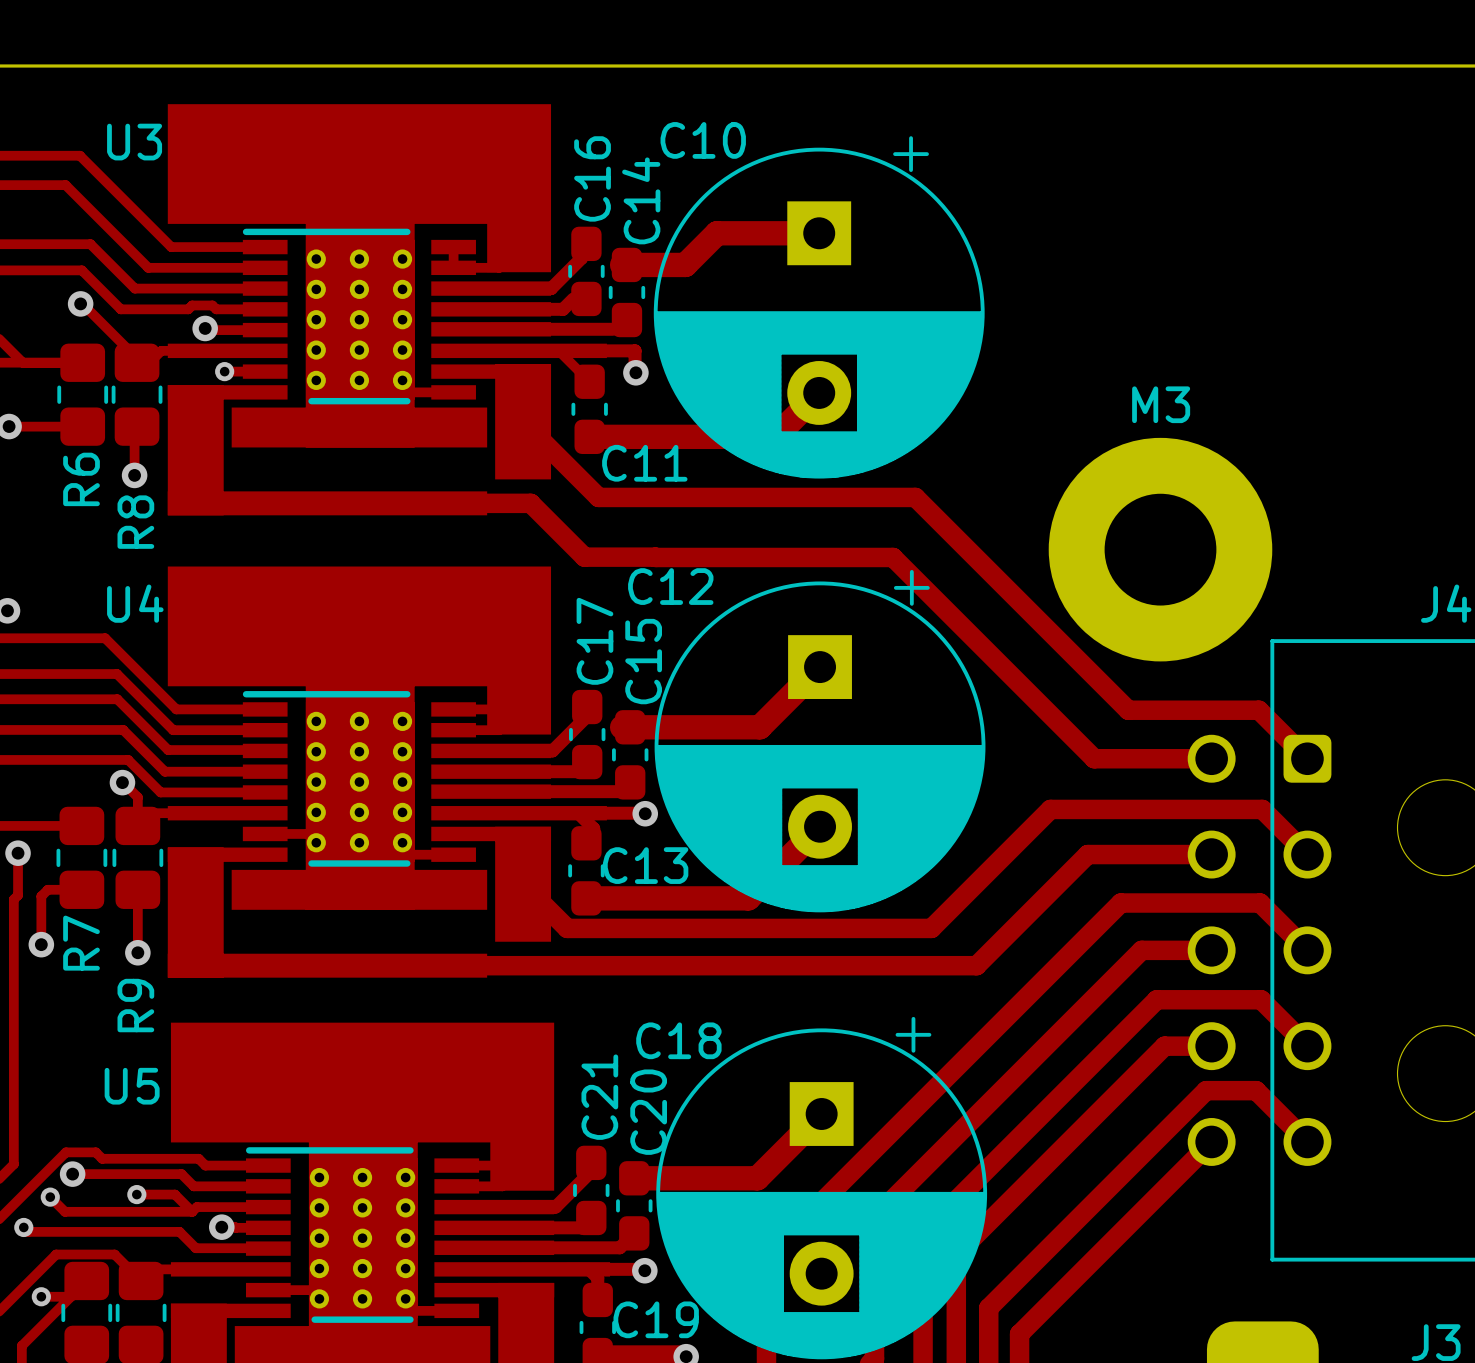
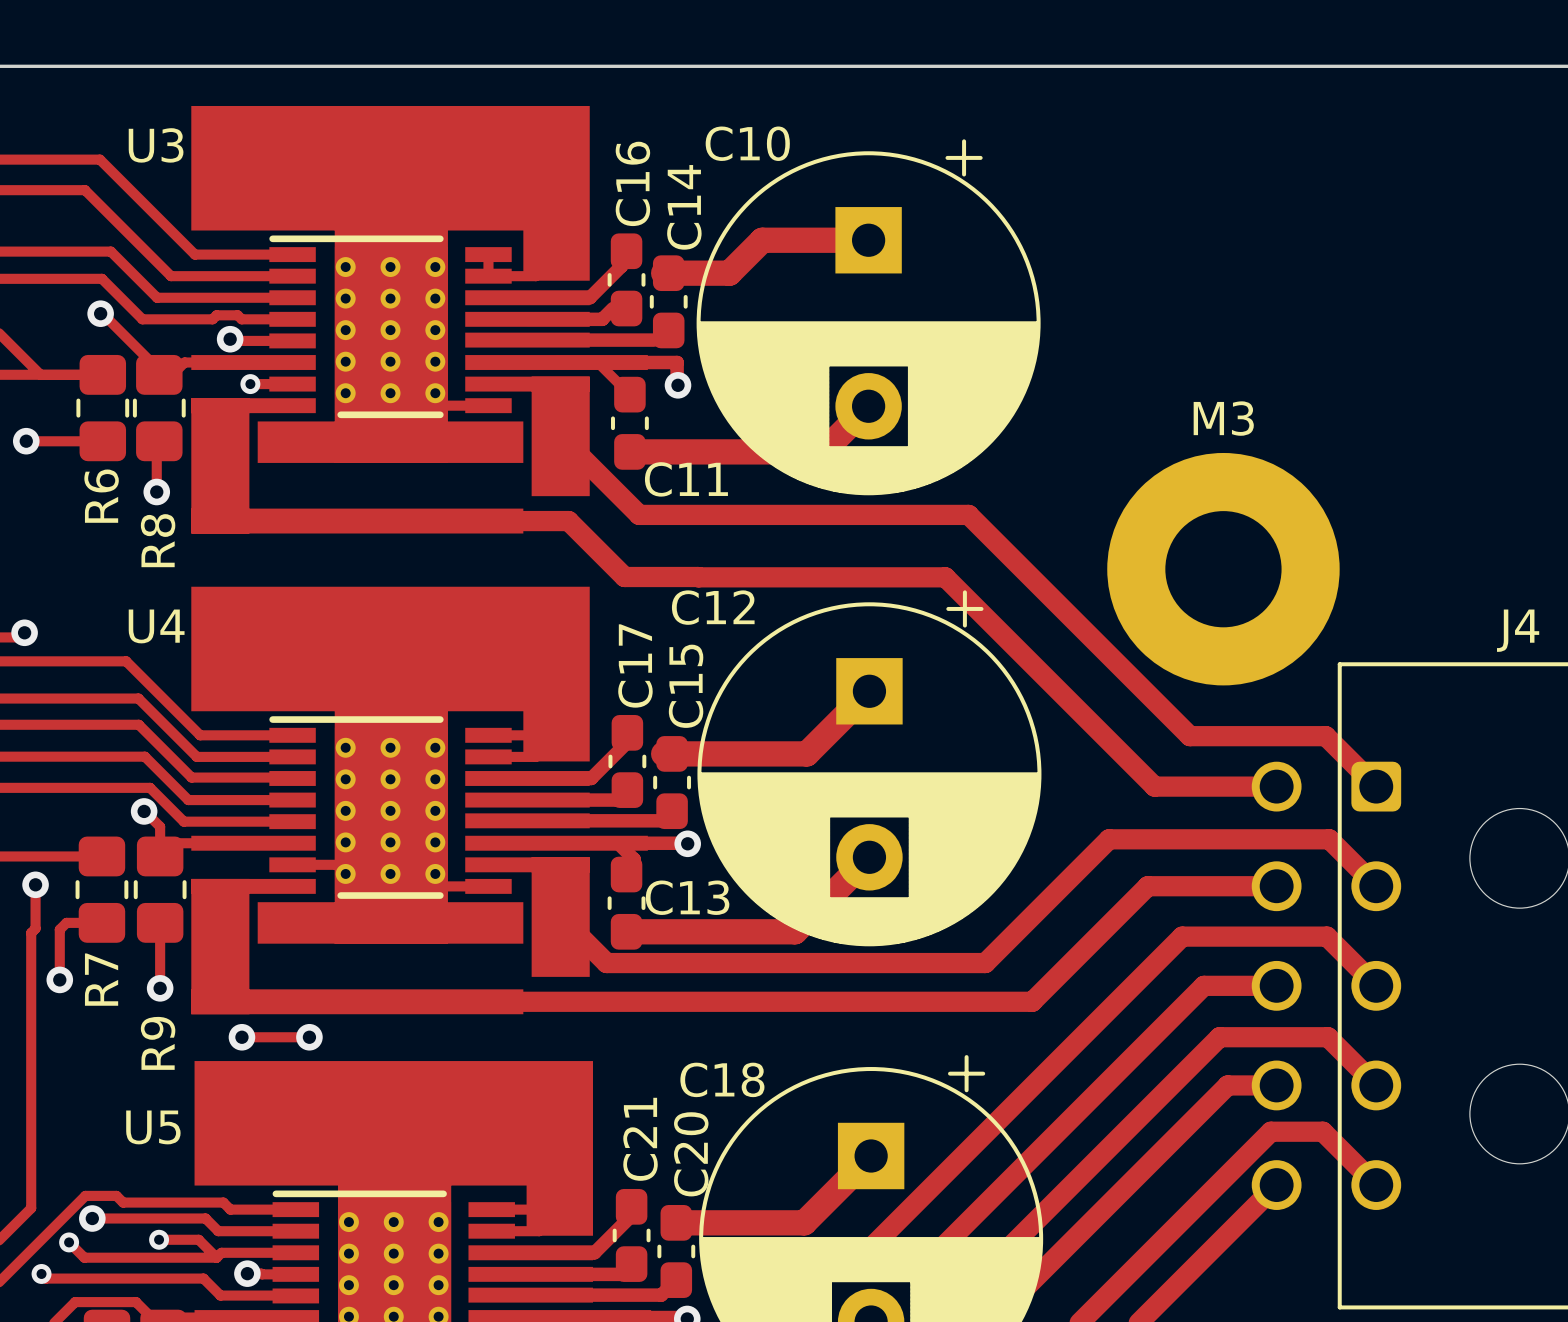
track: none -> (238, 1037) (309, 1037)
via: none -> (241, 1037)
via: none -> (309, 1037)

